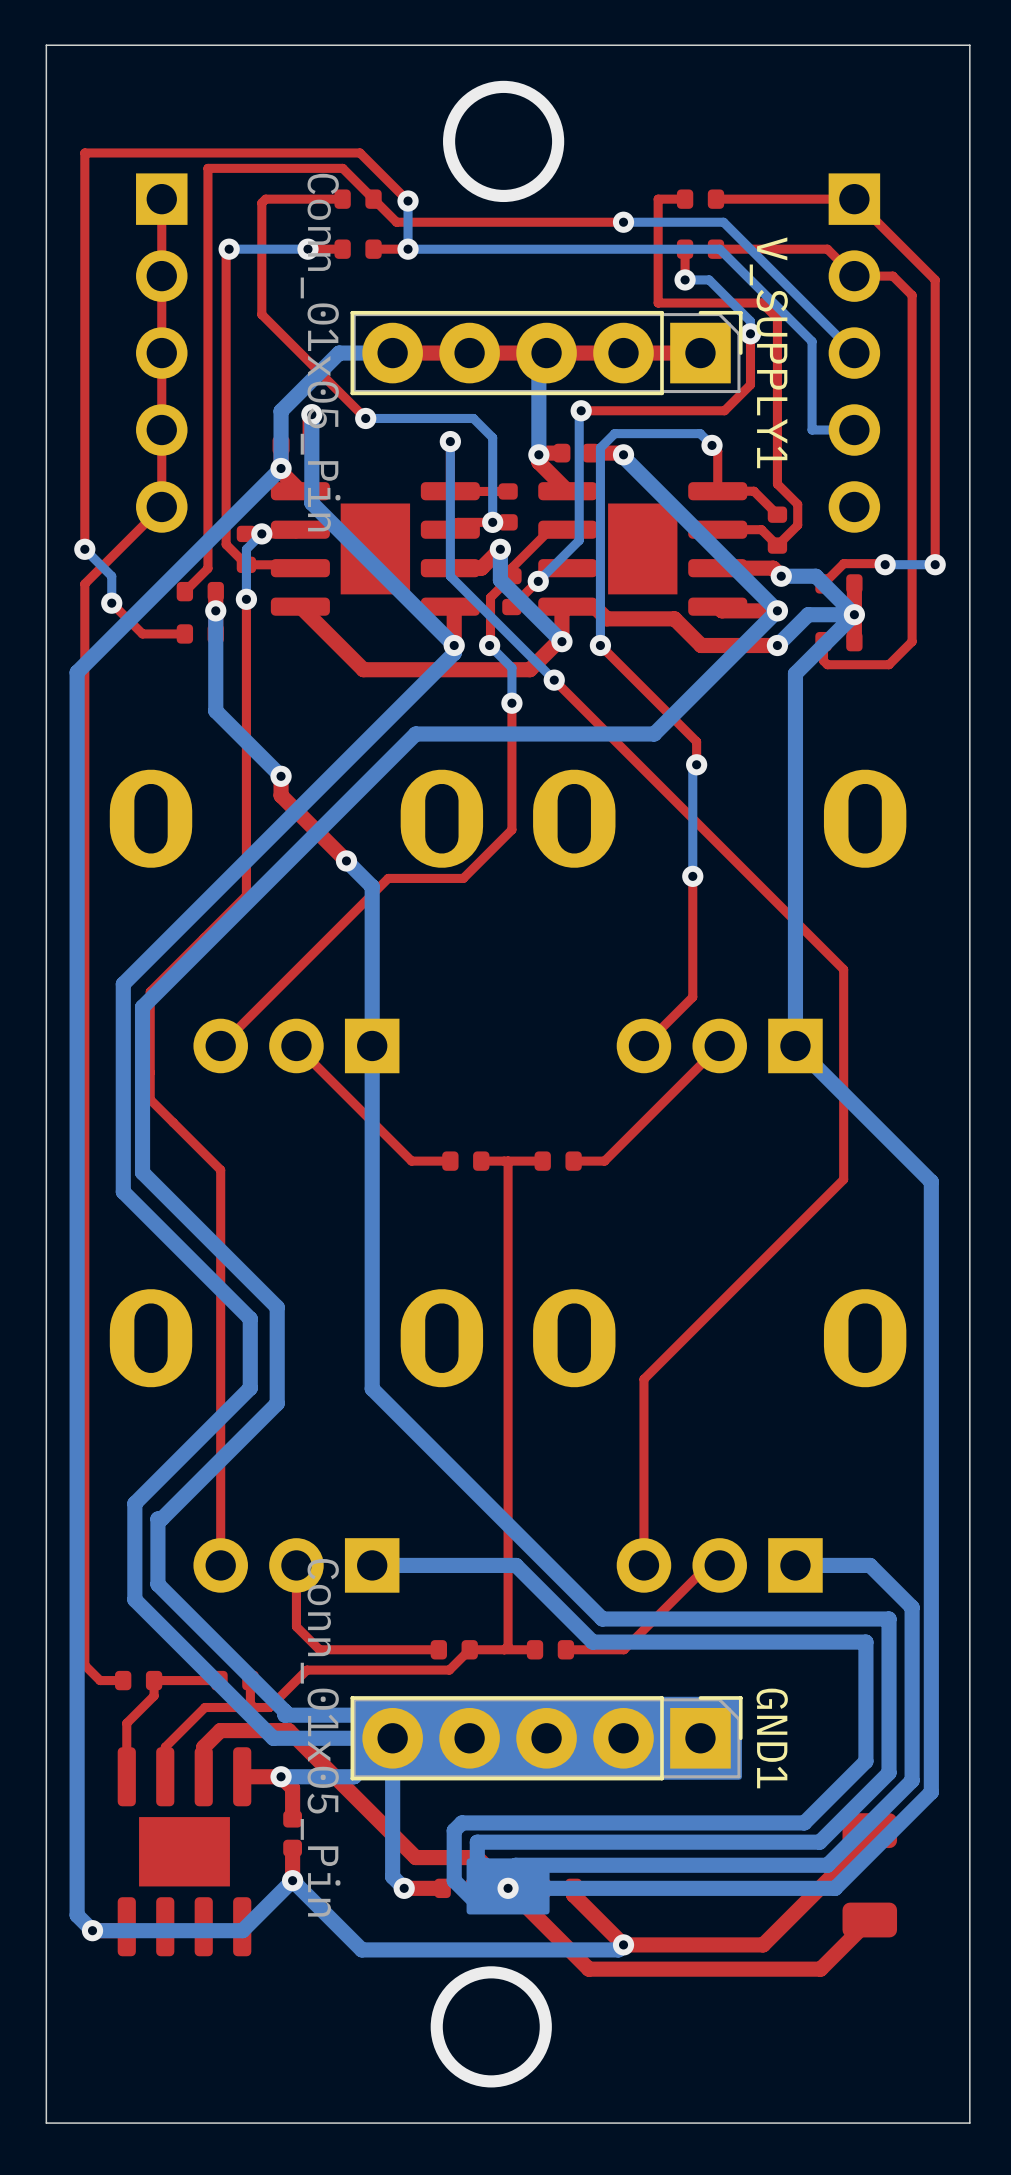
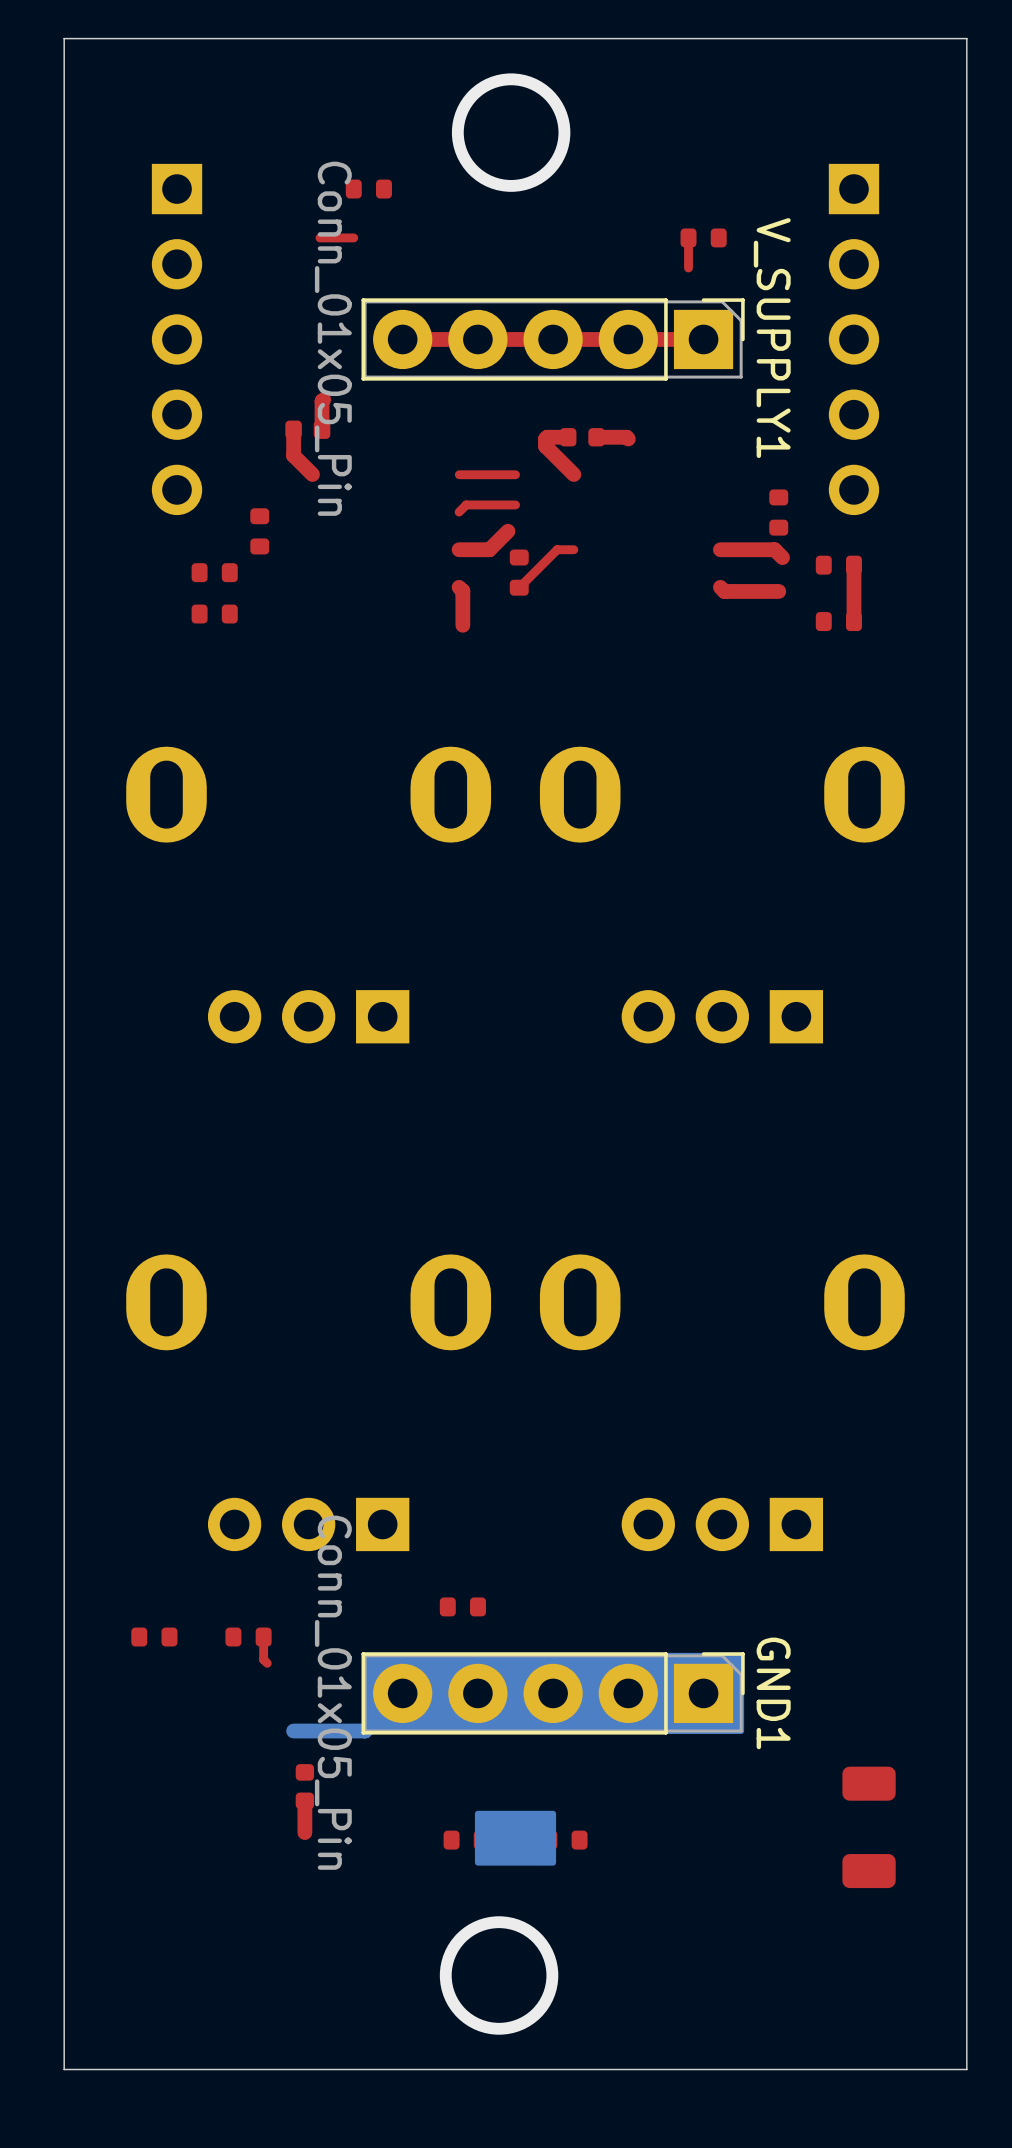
top track: (161, 199) (161, 506) (84, 583) (84, 1665) (100, 1680) (123, 1680) -> none
top track: (342, 199) (265, 199) (261, 202) (261, 314) (365, 418) -> none
top track: (685, 199) (658, 199) (658, 303) (762, 303) (777, 318) (777, 484) (797, 504) (797, 525) (777, 545) (761, 529) (717, 529) -> none
part: (700, 199) -> none
top track: (715, 199) (854, 199) (935, 279) (935, 564) -> none
top track: (408, 201) (359, 152) (84, 152) (84, 549) -> none
bottom track: (408, 201) (408, 249) (719, 249) (812, 341) (812, 430) (854, 430) -> none
via: (408, 201) -> none
top track: (623, 222) (396, 222) (342, 168) (207, 168) (207, 568) (184, 591) -> none
bottom track: (623, 222) (723, 222) (854, 353) -> none
via: (623, 222) -> none
top track: (229, 249) (226, 252) (226, 544) (246, 564) (297, 564) (300, 568) -> none
via: (229, 249) -> none
bottom track: (307, 249) (229, 249) -> none
via: (307, 249) -> none
part: (358, 249) -> none
top track: (408, 249) (373, 249) -> none
via: (408, 249) -> none
top track: (715, 249) (827, 249) (854, 276) (892, 276) (912, 295) (912, 641) (889, 664) (827, 664) (823, 660) (823, 641) -> none
bottom track: (685, 279) (709, 279) (750, 321) (750, 333) -> none
via: (685, 279) -> none
top track: (750, 333) (750, 384) (724, 410) (581, 410) -> none
via: (750, 333) -> none
bottom track: (392, 353) (339, 353) (281, 411) (281, 468) (77, 672) (77, 1915) (92, 1930) (242, 1930) (292, 1880) (361, 1949) (618, 1949) (623, 1944) -> none
bottom track: (546, 353) (538, 360) (538, 454) -> none
bottom track: (581, 410) (579, 412) (579, 540) (538, 581) -> none
via: (581, 410) -> none
bottom track: (311, 414) (311, 503) (454, 645) (454, 653) (123, 984) (123, 1191) (250, 1318) (250, 1388) (134, 1503) (134, 1599) (273, 1738) (546, 1738) (565, 1719) -> none
via: (311, 414) -> none
bottom track: (365, 418) (473, 418) (492, 437) (492, 522) -> none
via: (365, 418) -> none
bottom track: (450, 441) (450, 576) (554, 680) -> none
via: (450, 441) -> none
top track: (712, 445) (717, 451) (717, 491) (753, 491) (777, 514) -> none
bottom track: (712, 445) (700, 433) (614, 433) (600, 447) (600, 645) -> none
via: (712, 445) -> none
via: (538, 454) -> none
bottom track: (623, 454) (777, 610) (654, 734) (415, 734) (142, 1007) (142, 1172) (277, 1307) (277, 1403) (161, 1518) (157, 1518) (157, 1584) (284, 1711) (284, 1715) (369, 1715) (392, 1738) (392, 1876) (404, 1888) -> none
via: (623, 454) -> none
via: (281, 468) -> none
part: (508, 506) -> none
via: (492, 522) -> none
top track: (567, 529) (550, 529) (511, 567) (511, 576) (490, 597) (489, 645) -> none
bottom track: (261, 533) (246, 549) (246, 599) -> none
via: (261, 533) -> none
part: (375, 548) -> none
part: (642, 548) -> none
bottom track: (84, 549) (111, 576) (111, 603) -> none
via: (84, 549) -> none
bottom track: (500, 549) (500, 580) (561, 641) -> none
via: (500, 549) -> none
top track: (885, 564) (843, 563) (823, 583) -> none
via: (885, 564) -> none
bottom track: (935, 564) (885, 564) -> none
via: (935, 564) -> none
bottom track: (781, 576) (815, 576) (854, 614) -> none
via: (781, 576) -> none
via: (538, 581) -> none
top track: (246, 599) (246, 895) (150, 991) (150, 1099) (220, 1170) (220, 1565) -> none
via: (246, 599) -> none
top track: (111, 603) (142, 633) (184, 633) -> none
via: (111, 603) -> none
top track: (300, 606) (363, 669) (530, 669) (558, 641) (561, 641) (561, 612) (567, 606) (594, 606) (606, 618) (674, 618) (701, 645) (777, 645) -> none
bottom track: (215, 610) (215, 711) (281, 776) -> none
via: (215, 610) -> none
via: (777, 610) -> none
bottom track: (854, 614) (795, 673) (795, 1045) (931, 1181) (931, 1792) (835, 1888) (508, 1888) -> none
bottom track: (854, 614) (808, 614) (777, 645) -> none
via: (854, 614) -> none
via: (561, 641) -> none
via: (454, 645) -> none
bottom track: (489, 645) (511, 667) (511, 703) -> none
via: (489, 645) -> none
top track: (600, 645) (696, 741) (696, 764) -> none
via: (600, 645) -> none
via: (777, 645) -> none
top track: (554, 680) (843, 969) (843, 1179) (643, 1379) (643, 1565) -> none
via: (554, 680) -> none
top track: (511, 703) (511, 829) (463, 878) (388, 878) (220, 1045) -> none
via: (511, 703) -> none
bottom track: (696, 764) (692, 768) (692, 876) -> none
via: (696, 764) -> none
top track: (281, 776) (281, 795) (346, 860) -> none
via: (281, 776) -> none
bottom track: (346, 860) (372, 886) (372, 1388) (602, 1619) (889, 1619) (889, 1772) (819, 1842) (477, 1842) (477, 1865) (484, 1865) (508, 1888) -> none
via: (346, 860) -> none
top track: (692, 876) (692, 997) (643, 1045) -> none
via: (692, 876) -> none
top track: (296, 1045) (411, 1161) (450, 1161) -> none
top track: (719, 1045) (604, 1161) (573, 1161) -> none
part: (465, 1161) -> none
top track: (508, 1161) (508, 1646) (504, 1649) -> none
top track: (542, 1161) (481, 1161) -> none
part: (558, 1161) -> none
top track: (719, 1553) (623, 1649) (565, 1649) -> none
top track: (296, 1565) (296, 1626) (319, 1649) (438, 1649) -> none
bottom track: (372, 1565) (516, 1565) (592, 1642) (865, 1642) (865, 1761) (804, 1822) (461, 1822) (454, 1830) (454, 1880) (477, 1903) (492, 1903) (508, 1888) -> none
bottom track: (795, 1565) (870, 1565) (912, 1607) (912, 1780) (827, 1865) (515, 1865) (508, 1872) (508, 1888) -> none
top track: (535, 1649) (469, 1649) (449, 1670) (306, 1670) (269, 1707) (204, 1707) (165, 1747) (165, 1776) -> none
part: (550, 1649) -> none
top track: (219, 1680) (154, 1680) (154, 1695) (126, 1723) (126, 1776) -> none
top track: (203, 1776) (203, 1747) (220, 1730) (288, 1730) (415, 1857) (477, 1857) (588, 1969) (820, 1969) (869, 1920) -> none
top track: (242, 1776) (281, 1776) (292, 1788) (292, 1819) -> none
via: (281, 1776) -> none
top track: (869, 1830) (869, 1838) (763, 1944) (623, 1944) (573, 1895) (573, 1888) -> none
part: (184, 1851) -> none
via: (292, 1880) -> none
via: (404, 1888) -> none
top track: (442, 1888) (404, 1888) -> none
via: (508, 1888) -> none
via: (92, 1930) -> none
via: (623, 1944) -> none

